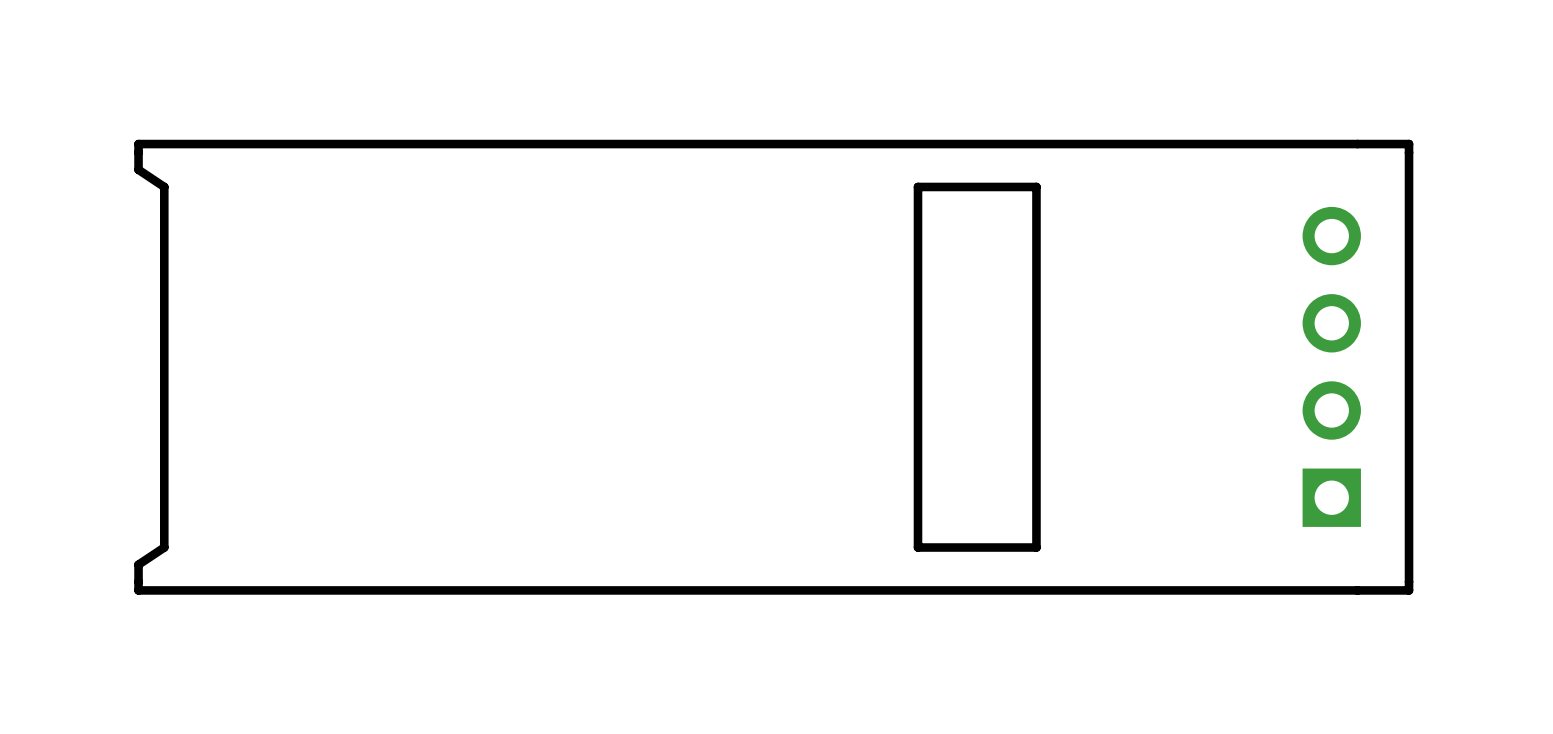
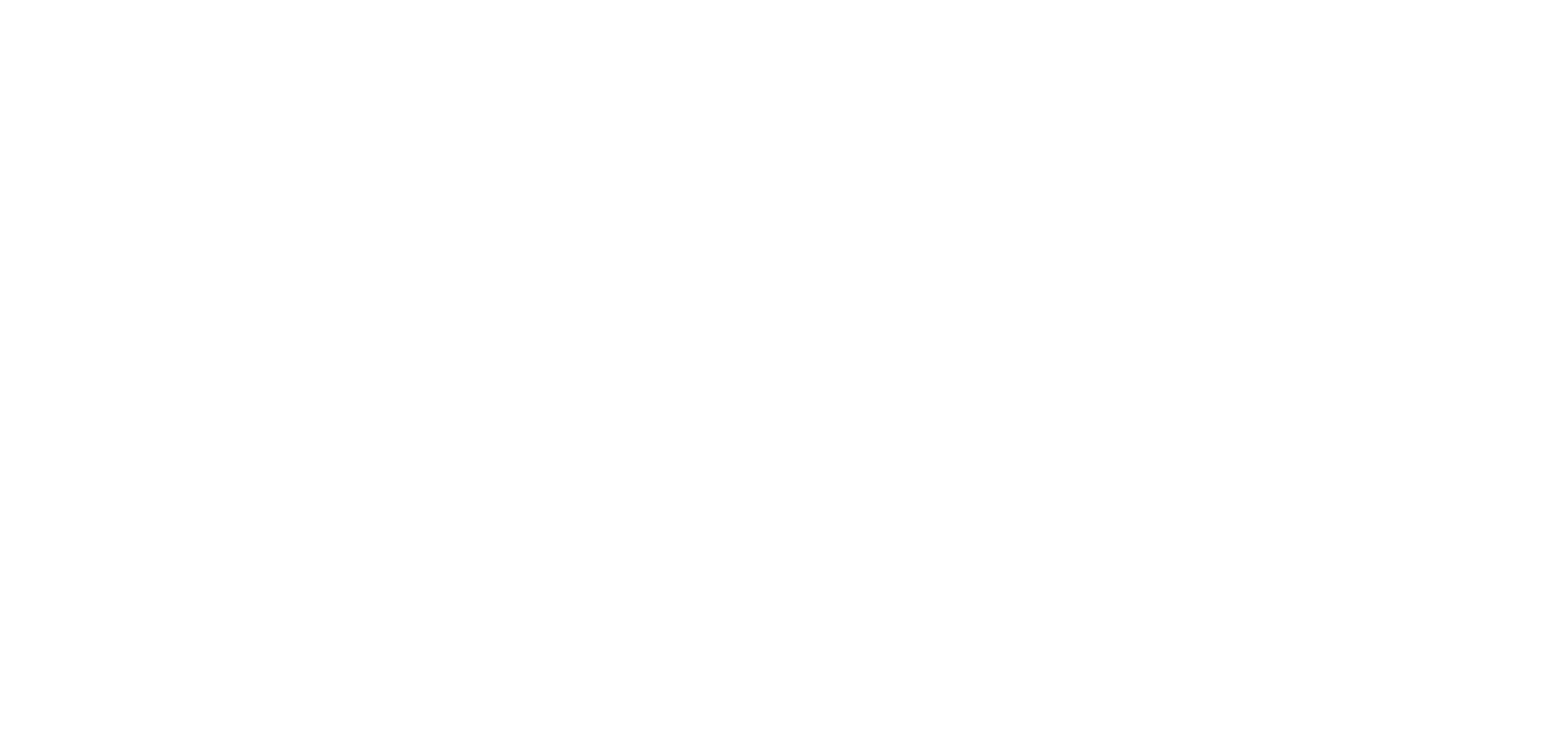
board edge: (1409, 144) (138, 144) (138, 169) (164, 186) (164, 547) (138, 564) (138, 590) (1409, 590) (1409, 144) -> none
board edge: (1036, 186) (917, 186) (917, 547) (1036, 547) (1036, 186) -> none
part: (1331, 366) -> none

